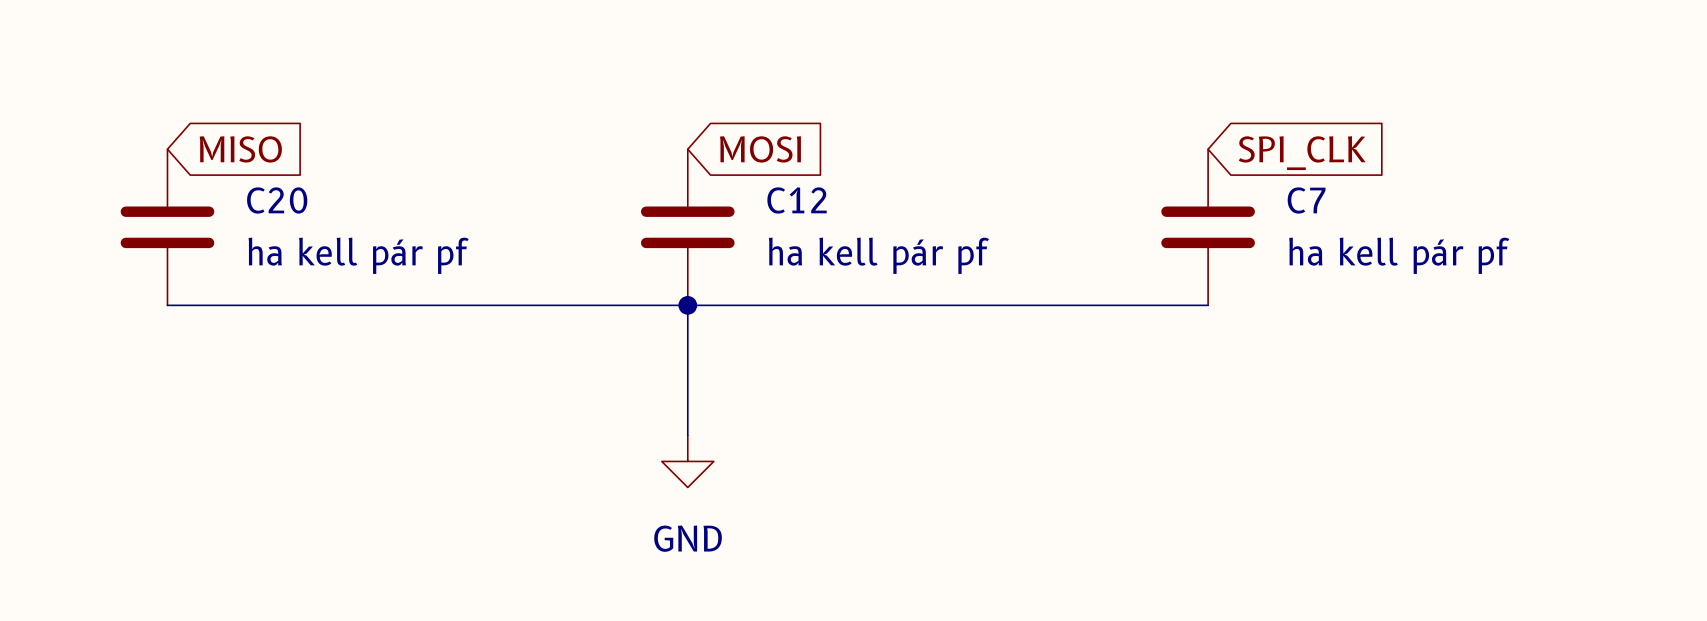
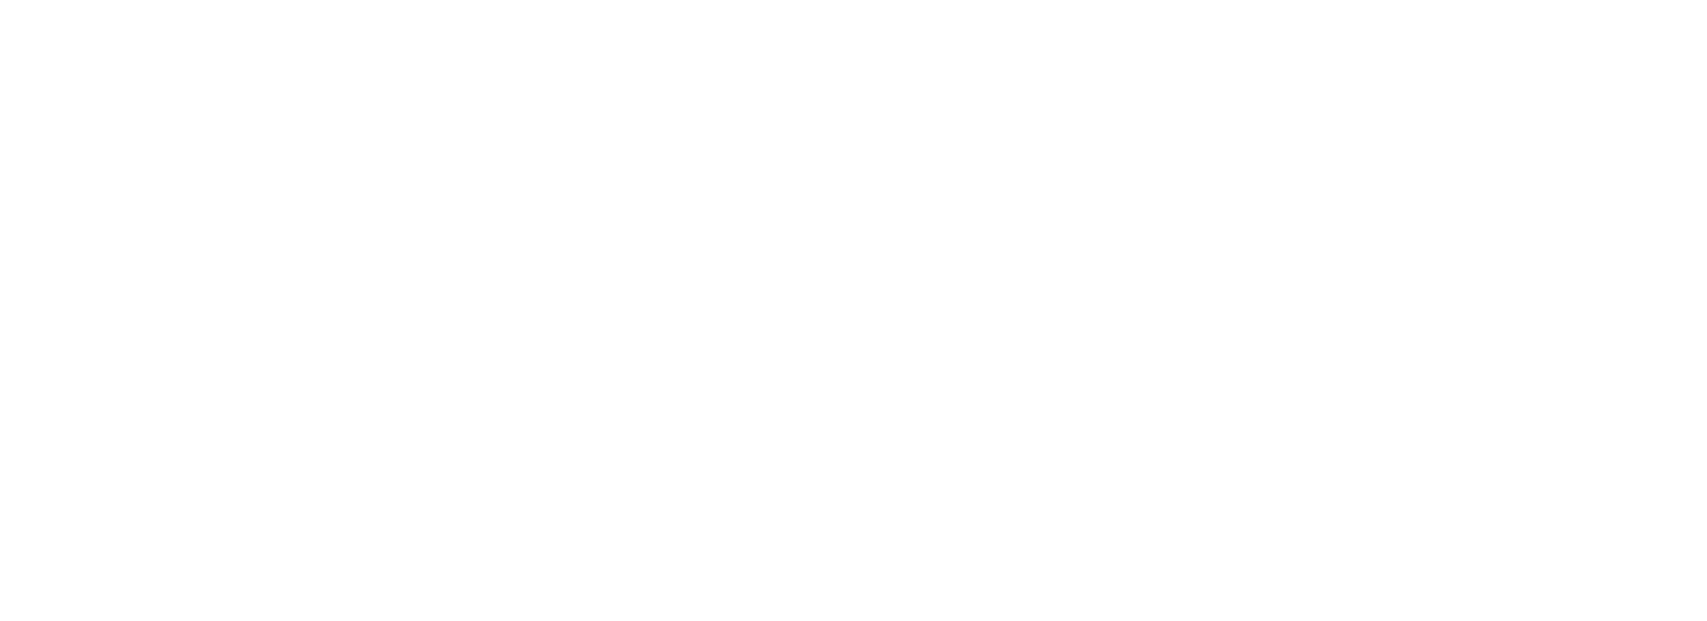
global label: MISO (240, 149) -> none
global label: MOSI (760, 149) -> none
global label: SPI_CLK (1302, 153) -> none
C20: ha kell pár pf (167, 227) -> none
C12: ha kell pár pf (687, 227) -> none
C7: ha kell pár pf (1208, 227) -> none
wire: (167, 305) (1208, 305) -> none
wire: (687, 305) (687, 435) -> none
junction: (687, 305) -> none
power symbol: GND (687, 461) -> none

